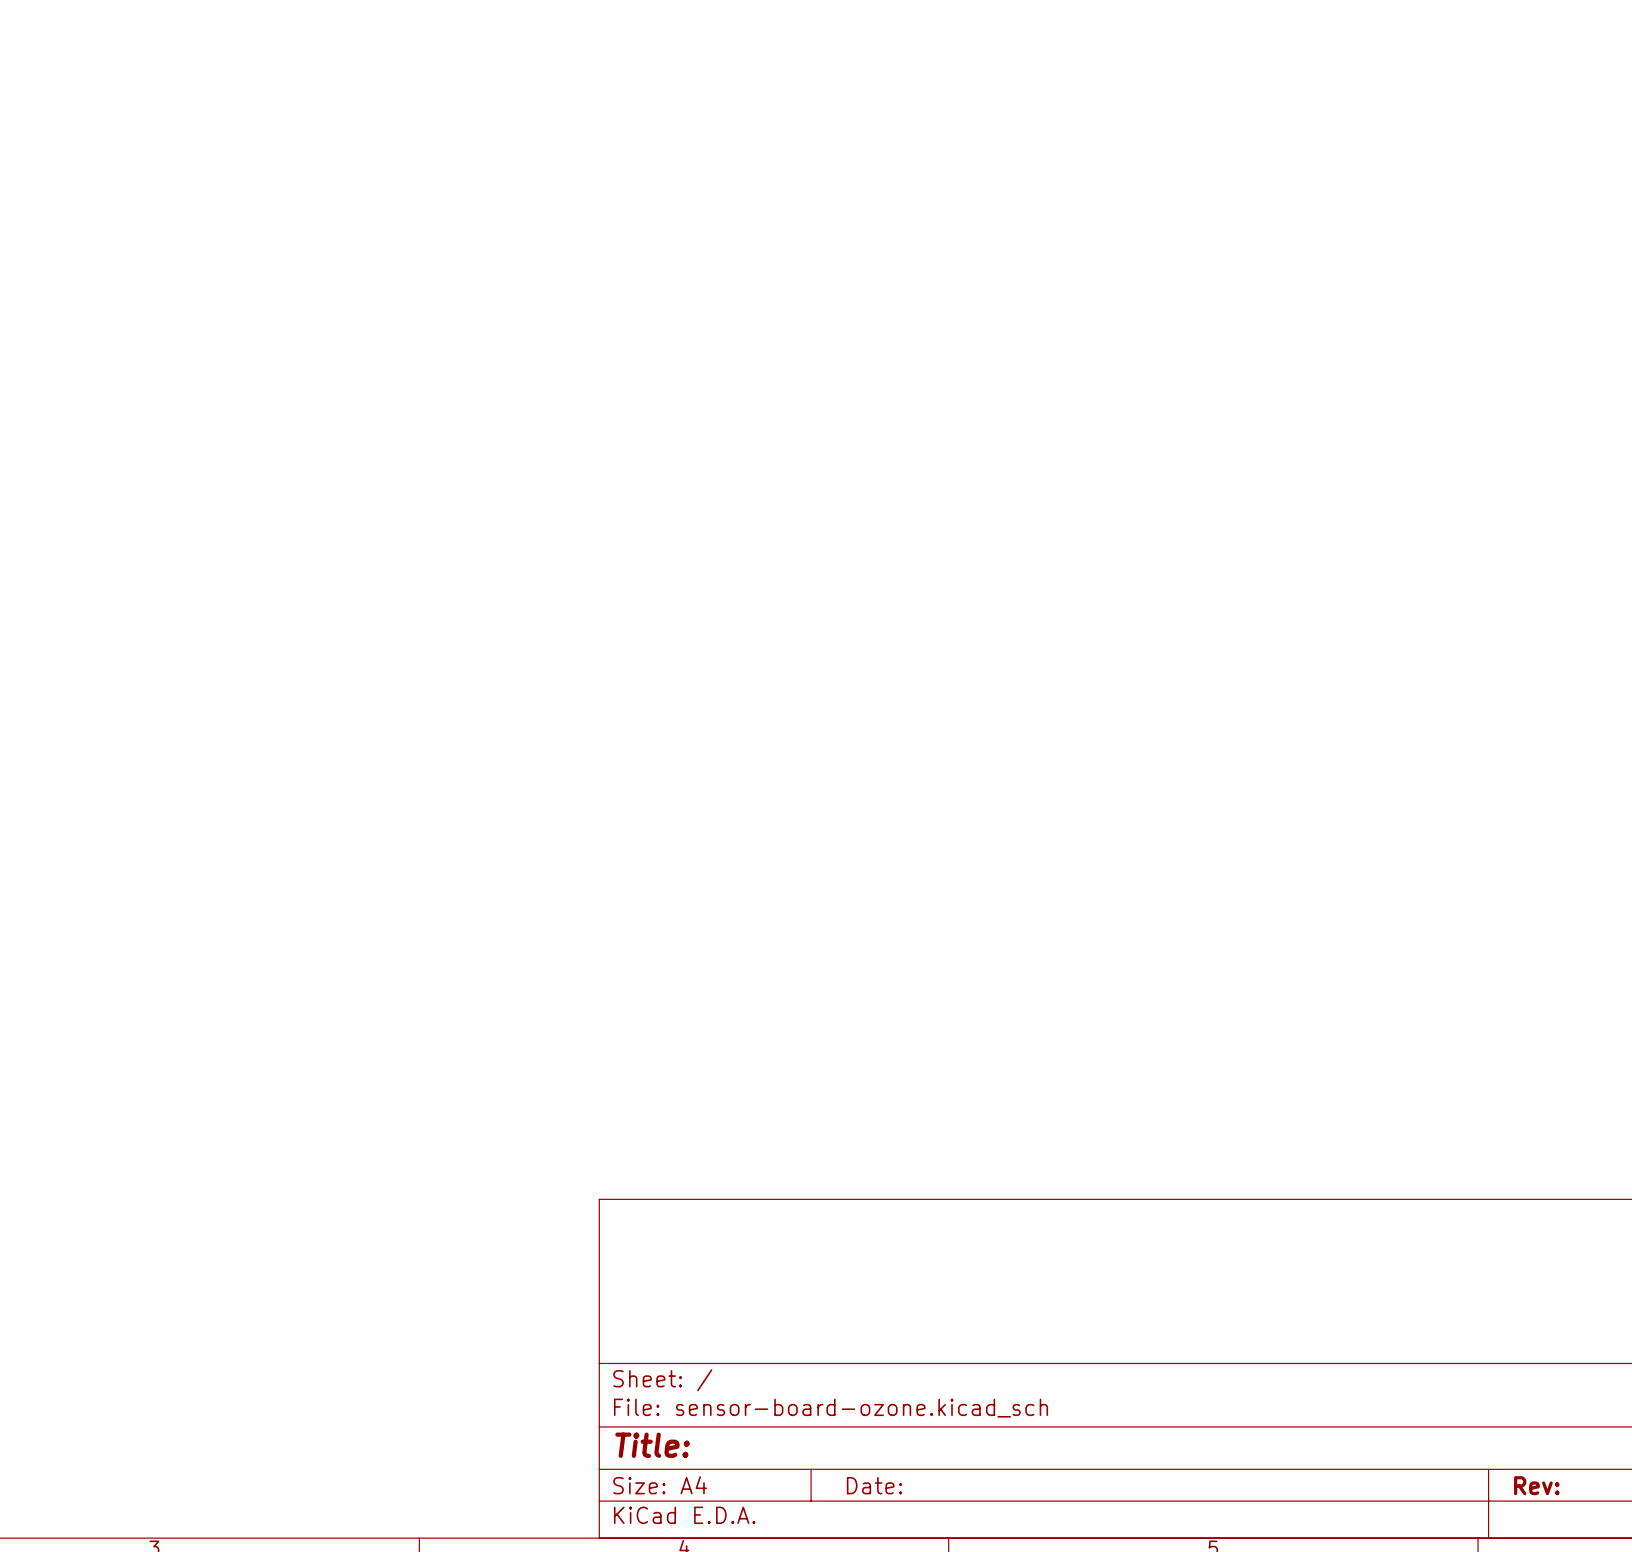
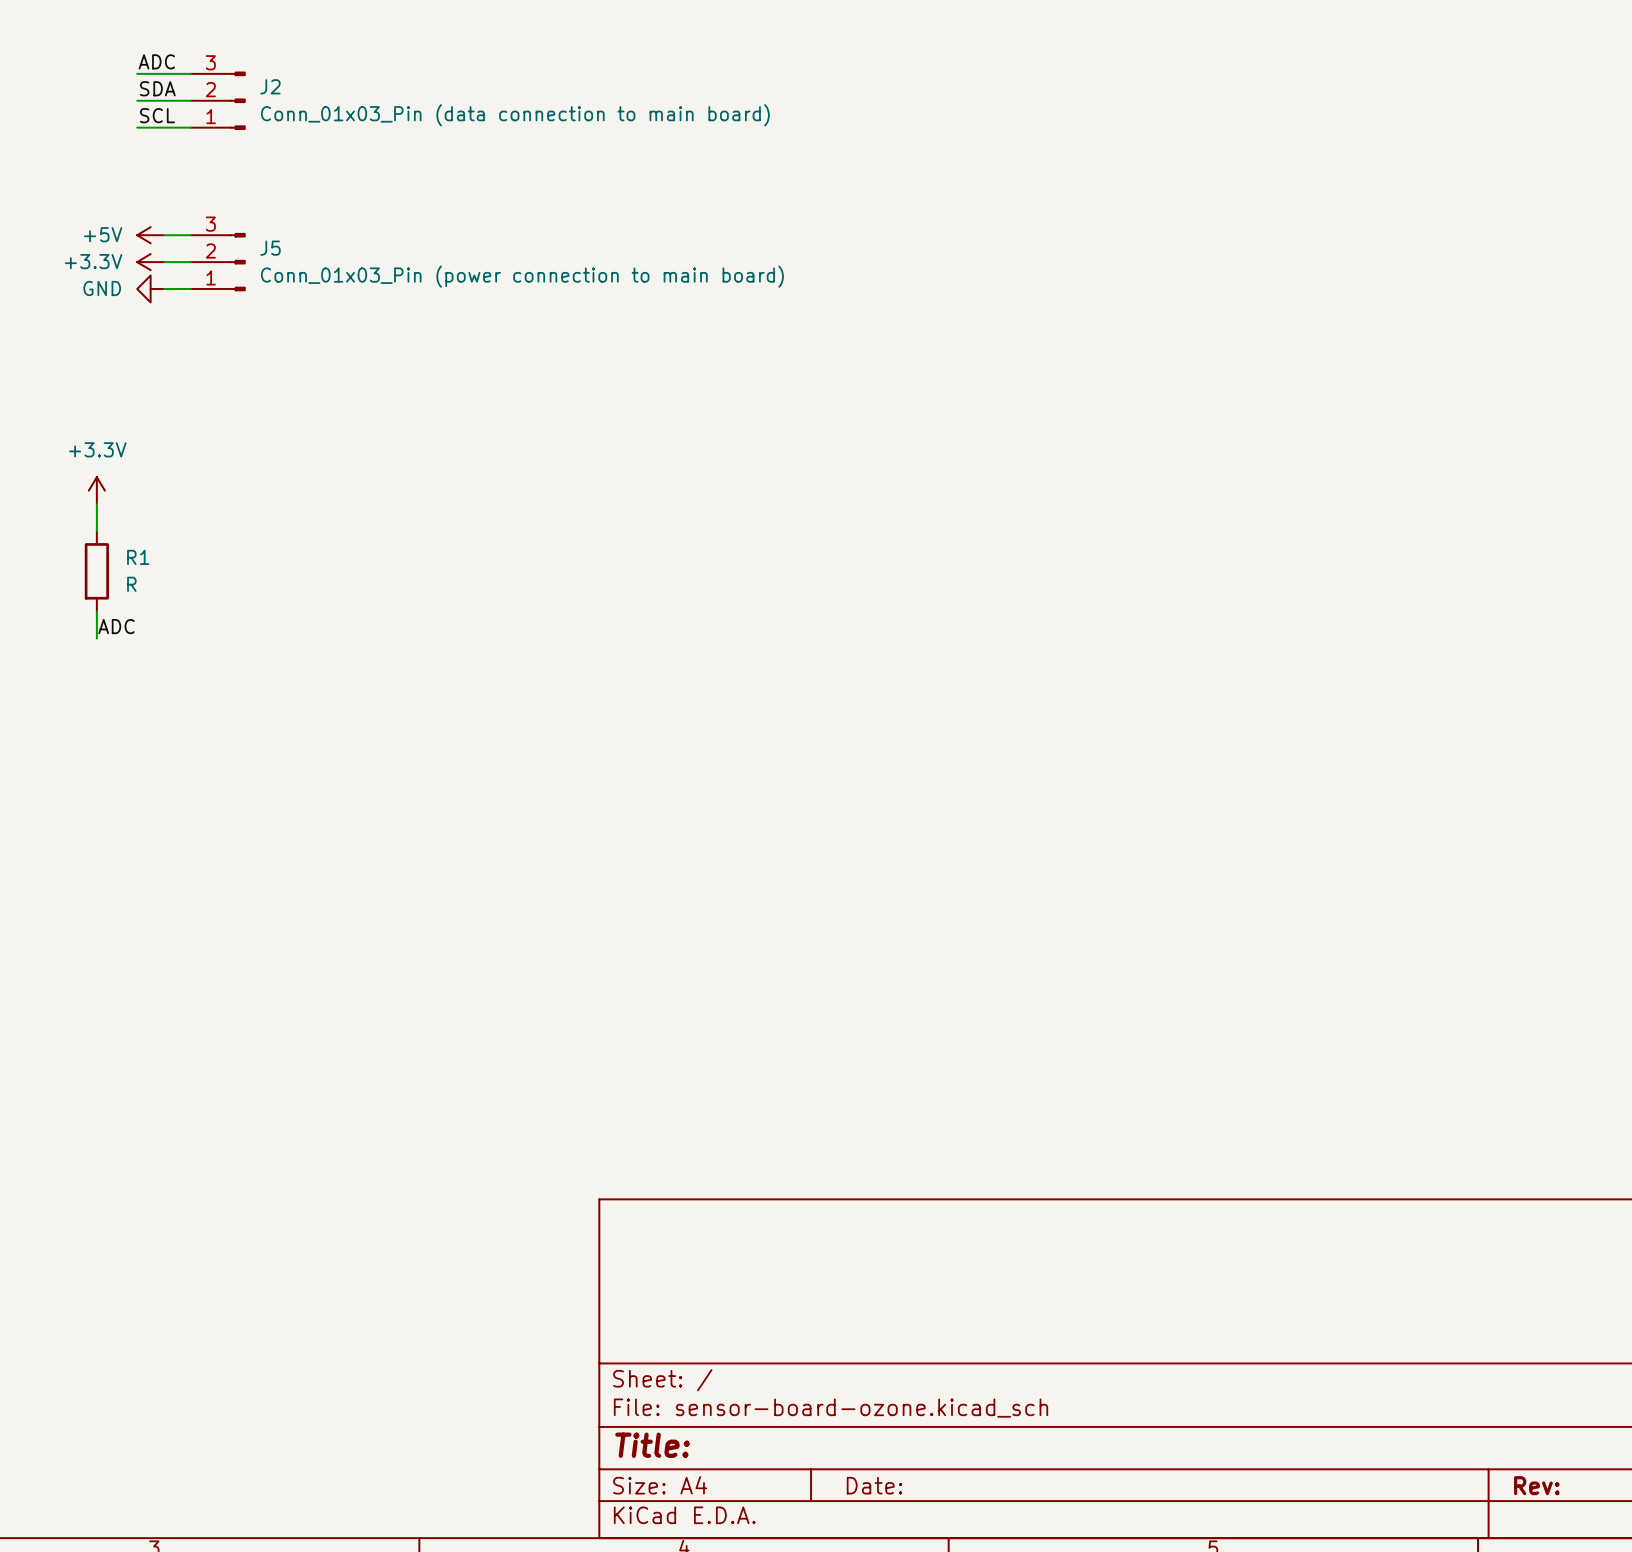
label: none -> ADC (156, 61)
wire: none -> (137, 73) (190, 73)
label: none -> SDA (157, 88)
wire: none -> (137, 100) (190, 100)
J2: none -> Conn_01x03_Pin (data connection to main board) (218, 100)
label: none -> SCL (157, 115)
wire: none -> (137, 127) (190, 127)
power symbol: none -> +5V (150, 235)
wire: none -> (164, 235) (190, 235)
power symbol: none -> +3.3V (150, 262)
wire: none -> (164, 262) (190, 262)
J5: none -> Conn_01x03_Pin (power connection to main board) (218, 262)
power symbol: none -> GND (150, 288)
wire: none -> (164, 288) (190, 288)
power symbol: none -> +3.3V (96, 490)
wire: none -> (96, 504) (96, 531)
R1: none -> R (96, 571)
wire: none -> (96, 611) (96, 638)
label: none -> ADC (116, 626)

